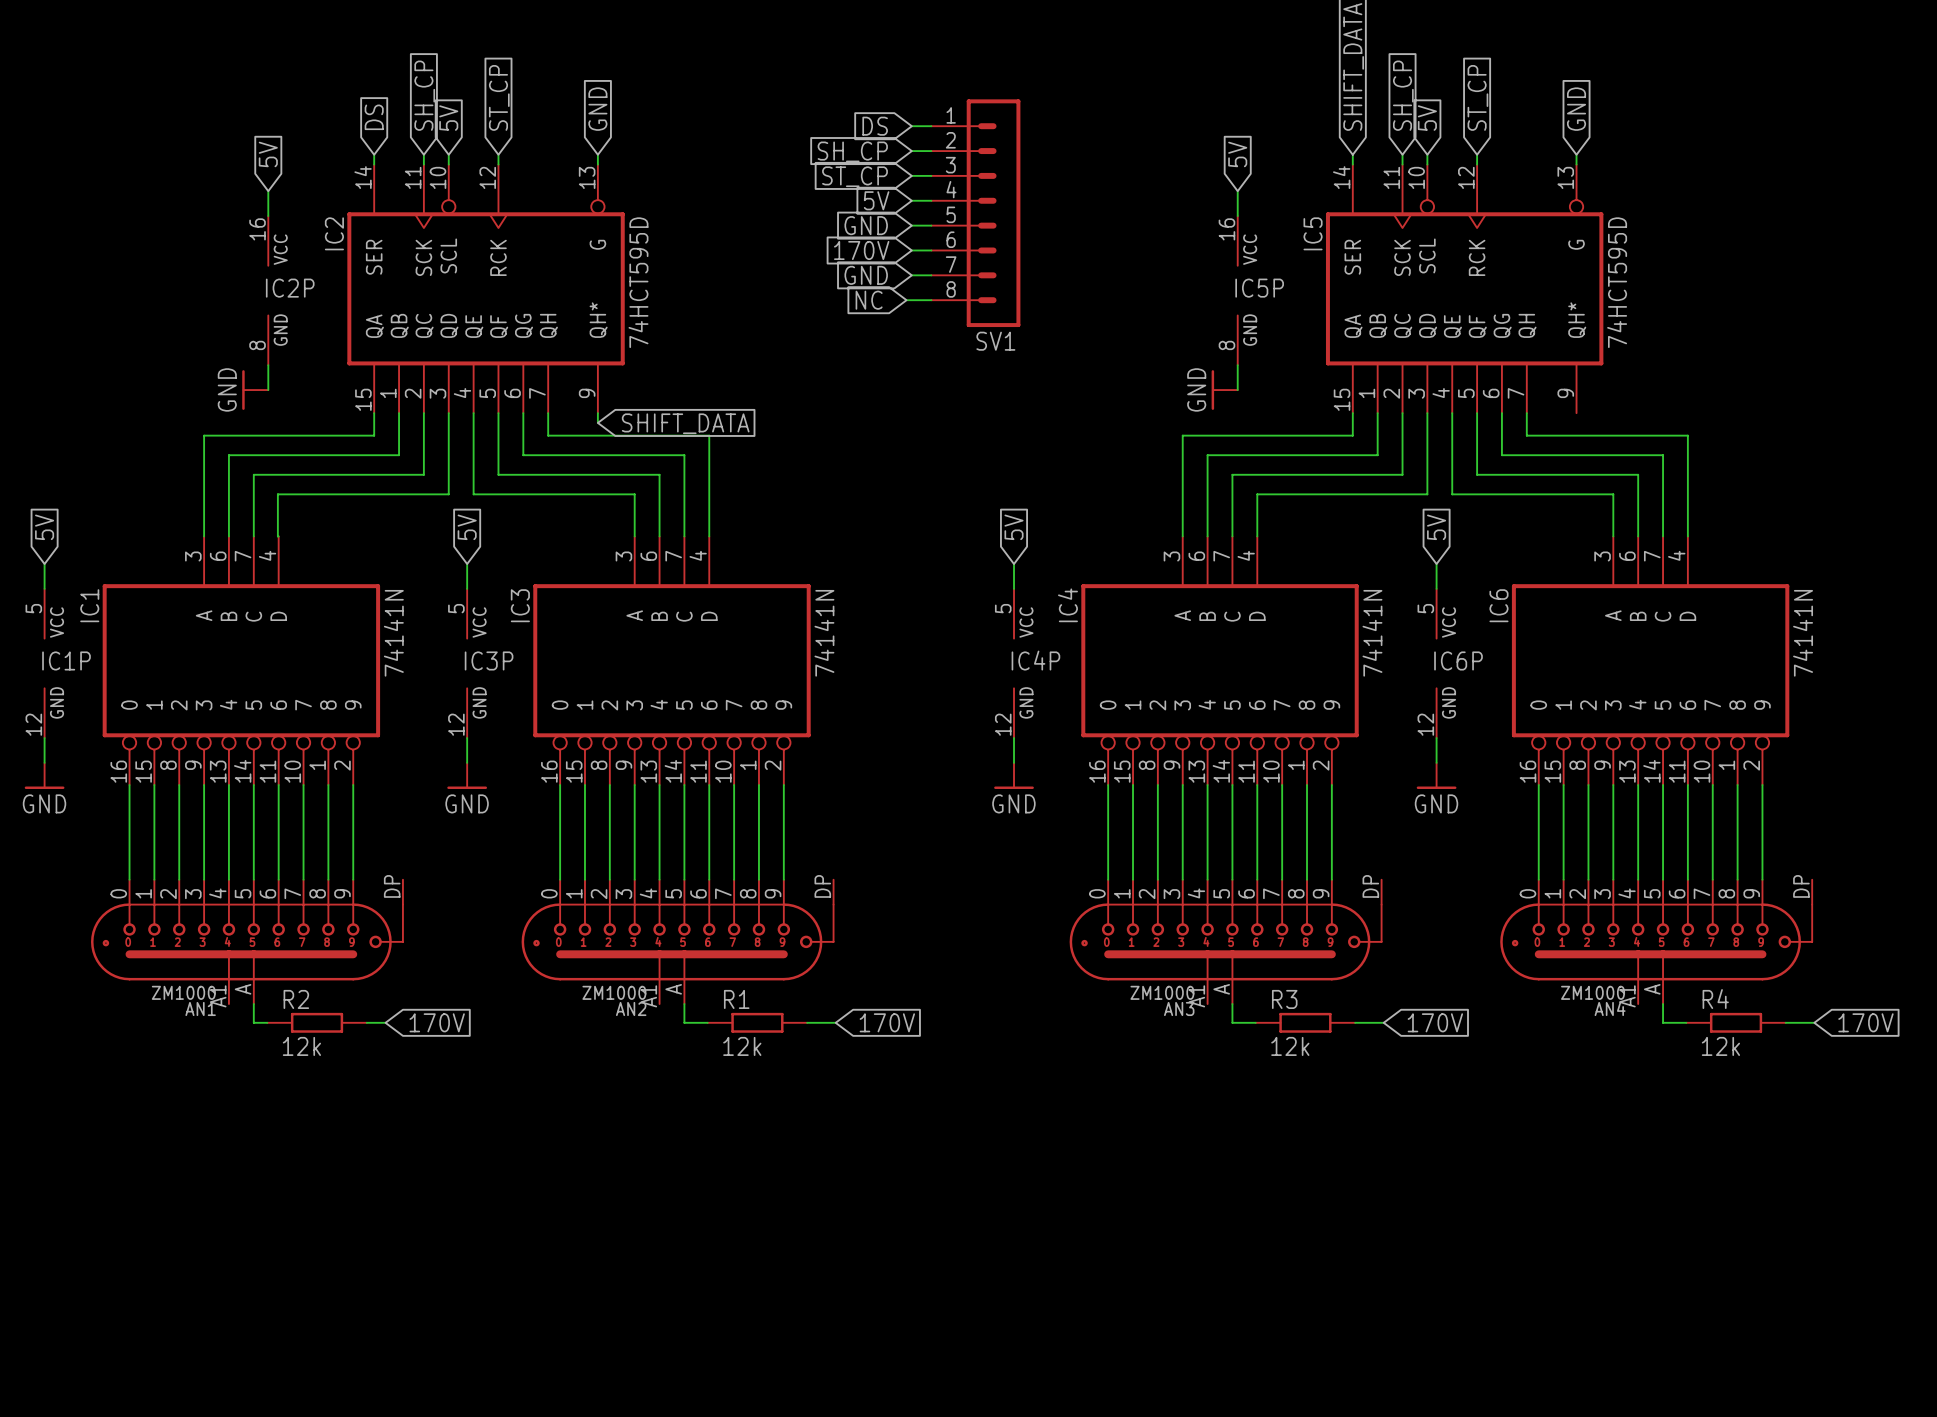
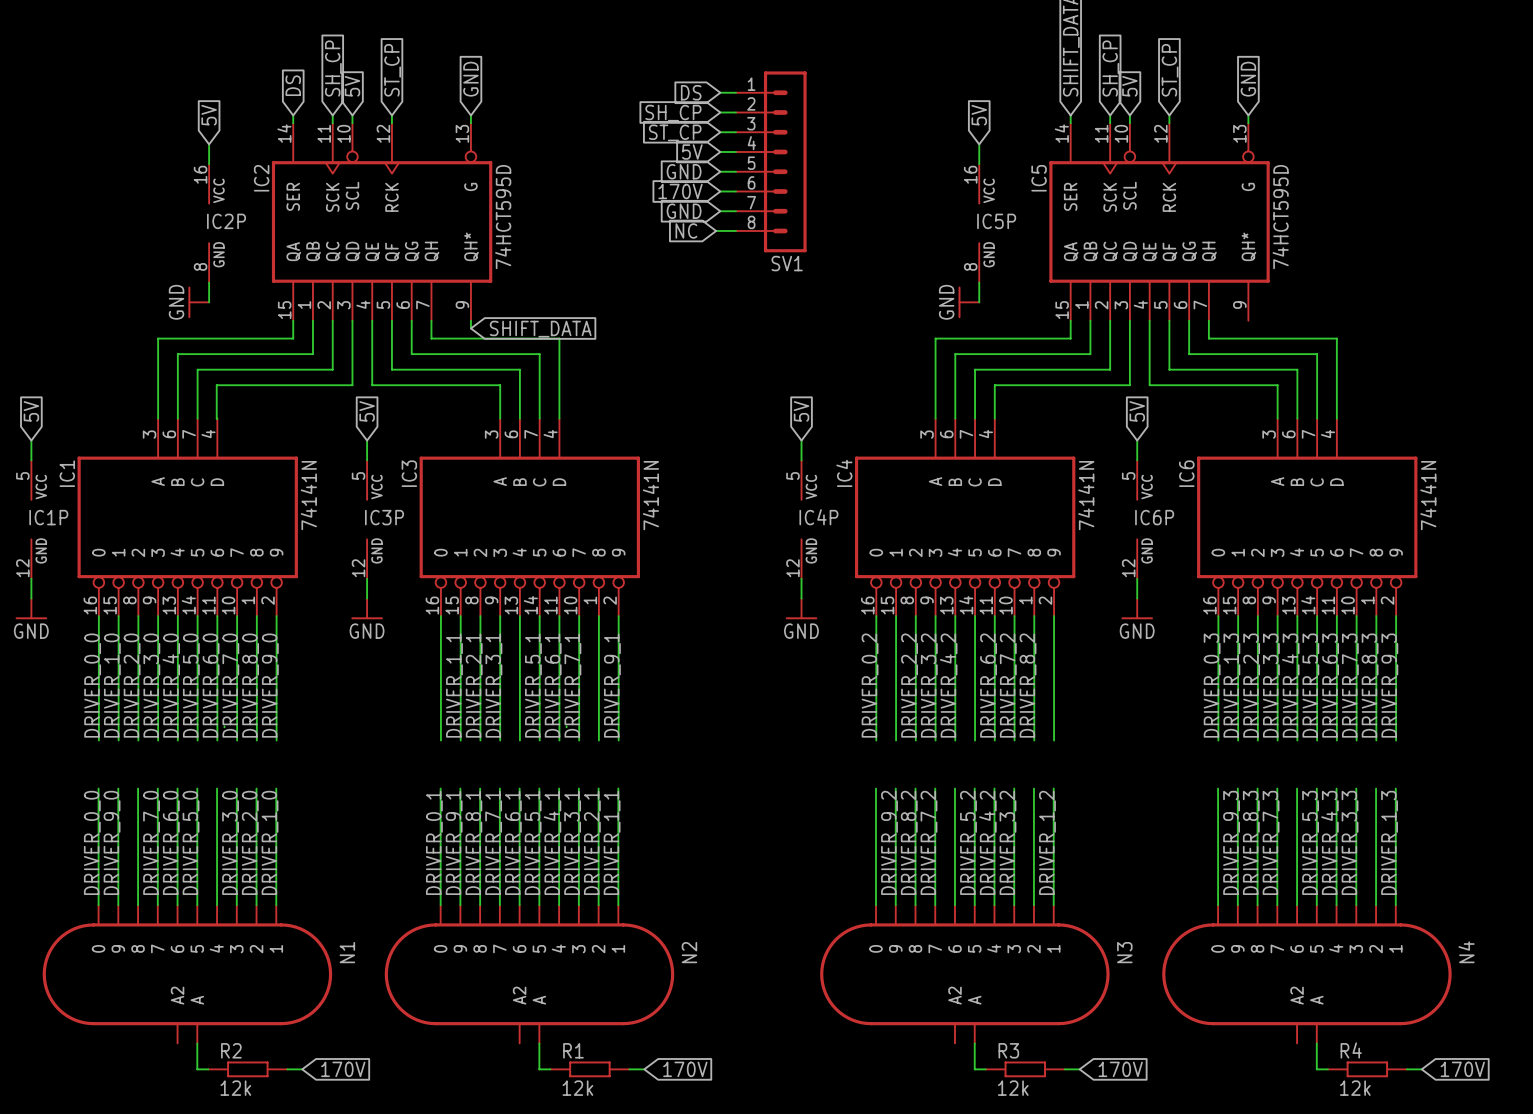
label: none -> DRIVER_0_0 (92, 685)
label: none -> DRIVER_1_0 (112, 685)
label: none -> DRIVER_2_0 (132, 685)
label: none -> DRIVER_3_0 (151, 685)
label: none -> DRIVER_4_0 (171, 685)
label: none -> DRIVER_5_0 (191, 685)
label: none -> DRIVER_6_0 (211, 685)
label: none -> DRIVER_7_0 (230, 685)
label: none -> DRIVER_8_0 (250, 685)
label: none -> DRIVER_9_0 (270, 685)
label: none -> DRIVER_1_1 (454, 685)
label: none -> DRIVER_2_1 (474, 685)
label: none -> DRIVER_3_1 (493, 685)
label: none -> DRIVER_5_1 (533, 685)
label: none -> DRIVER_6_1 (553, 685)
label: none -> DRIVER_7_1 (572, 685)
label: none -> DRIVER_9_1 (612, 685)
label: none -> DRIVER_0_2 (870, 685)
label: none -> DRIVER_2_2 (909, 685)
label: none -> DRIVER_3_2 (929, 685)
label: none -> DRIVER_4_2 (948, 685)
label: none -> DRIVER_6_2 (988, 685)
label: none -> DRIVER_7_2 (1008, 685)
label: none -> DRIVER_8_2 (1028, 685)
label: none -> DRIVER_0_3 (1212, 685)
label: none -> DRIVER_1_3 (1231, 685)
label: none -> DRIVER_2_3 (1251, 685)
label: none -> DRIVER_3_3 (1271, 685)
label: none -> DRIVER_4_3 (1290, 685)
label: none -> DRIVER_5_3 (1310, 685)
label: none -> DRIVER_6_3 (1330, 685)
label: none -> DRIVER_7_3 (1350, 685)
label: none -> DRIVER_8_3 (1370, 685)
label: none -> DRIVER_9_3 (1389, 685)
wire: none -> (224, 726) (224, 727)
wire: none -> (566, 726) (566, 727)
AN1: ZM1000 (247, 941) -> none
AN2: ZM1000 (677, 941) -> none
AN3: ZM1000 (1225, 941) -> none
AN4: ZM1000 (1656, 941) -> none
wire: none -> (98, 788) (98, 905)
wire: none -> (118, 788) (118, 905)
wire: none -> (138, 788) (138, 905)
wire: none -> (157, 788) (157, 905)
wire: none -> (177, 788) (177, 905)
wire: none -> (197, 788) (197, 905)
wire: none -> (217, 788) (217, 905)
wire: none -> (236, 788) (236, 905)
wire: none -> (256, 788) (256, 905)
wire: none -> (276, 788) (276, 905)
wire: none -> (440, 788) (440, 905)
wire: none -> (460, 788) (460, 905)
wire: none -> (480, 788) (480, 905)
wire: none -> (499, 788) (499, 905)
wire: none -> (519, 788) (519, 905)
wire: none -> (539, 788) (539, 905)
wire: none -> (559, 788) (559, 905)
wire: none -> (578, 788) (578, 905)
wire: none -> (598, 788) (598, 905)
wire: none -> (618, 788) (618, 905)
wire: none -> (876, 788) (876, 905)
wire: none -> (895, 788) (895, 905)
wire: none -> (915, 788) (915, 905)
wire: none -> (935, 788) (935, 905)
wire: none -> (954, 788) (954, 905)
wire: none -> (974, 788) (974, 905)
wire: none -> (994, 788) (994, 905)
wire: none -> (1014, 788) (1014, 905)
wire: none -> (1033, 788) (1033, 905)
wire: none -> (1053, 788) (1053, 905)
wire: none -> (1218, 788) (1218, 905)
wire: none -> (1237, 788) (1237, 905)
wire: none -> (1257, 788) (1257, 905)
wire: none -> (1277, 788) (1277, 905)
wire: none -> (1297, 788) (1297, 905)
wire: none -> (1316, 788) (1316, 905)
wire: none -> (1336, 788) (1336, 905)
wire: none -> (1356, 788) (1356, 905)
wire: none -> (1376, 788) (1376, 905)
wire: none -> (1395, 788) (1395, 905)
wire: (253, 1004) (253, 1022) (267, 1022) -> none
wire: (684, 1004) (684, 1022) (707, 1022) -> none
wire: (1232, 1004) (1232, 1022) (1255, 1022) -> none
wire: (1663, 1004) (1663, 1022) (1686, 1022) -> none
R2 position: (317, 1022) -> (247, 1069)
wire: (366, 1022) (385, 1022) -> none
global label: 170V (437, 1022) -> none
R1 position: (757, 1022) -> (589, 1069)
wire: (807, 1022) (835, 1022) -> none
global label: 170V (887, 1022) -> none
R3 position: (1305, 1022) -> (1025, 1069)
wire: (1355, 1022) (1383, 1022) -> none
global label: 170V (1435, 1022) -> none
R4 position: (1736, 1022) -> (1367, 1069)
wire: (1785, 1022) (1814, 1022) -> none
global label: 170V (1865, 1022) -> none
label: none -> DRIVER_0_0 (92, 842)
label: none -> DRIVER_9_0 (112, 842)
label: none -> DRIVER_7_0 (151, 842)
label: none -> DRIVER_6_0 (171, 842)
label: none -> DRIVER_5_0 (191, 842)
label: none -> DRIVER_3_0 (230, 842)
label: none -> DRIVER_2_0 (250, 842)
label: none -> DRIVER_1_0 (270, 842)
label: none -> DRIVER_0_1 (434, 842)
label: none -> DRIVER_9_1 (454, 842)
label: none -> DRIVER_8_1 (473, 842)
label: none -> DRIVER_7_1 (493, 842)
label: none -> DRIVER_6_1 (513, 842)
label: none -> DRIVER_5_1 (533, 842)
label: none -> DRIVER_4_1 (552, 842)
label: none -> DRIVER_3_1 (572, 842)
label: none -> DRIVER_2_1 (592, 842)
label: none -> DRIVER_1_1 (612, 842)
label: none -> DRIVER_9_2 (889, 842)
label: none -> DRIVER_8_2 (909, 842)
label: none -> DRIVER_7_2 (928, 842)
label: none -> DRIVER_5_2 (968, 842)
label: none -> DRIVER_4_2 (987, 842)
label: none -> DRIVER_3_2 (1007, 842)
label: none -> DRIVER_1_2 (1047, 842)
label: none -> DRIVER_9_3 (1231, 842)
label: none -> DRIVER_8_3 (1251, 842)
label: none -> DRIVER_7_3 (1271, 842)
label: none -> DRIVER_5_3 (1310, 842)
label: none -> DRIVER_4_3 (1329, 842)
label: none -> DRIVER_3_3 (1350, 842)
label: none -> DRIVER_1_3 (1389, 842)
N1: none -> (187, 974)
N2: none -> (529, 974)
N3: none -> (964, 974)
N4: none -> (1306, 974)
wire: none -> (197, 1043) (197, 1069) (208, 1069)
wire: none -> (539, 1043) (539, 1069) (550, 1069)
wire: none -> (974, 1043) (974, 1069) (985, 1069)
wire: none -> (1316, 1043) (1316, 1069) (1327, 1069)
wire: none -> (287, 1069) (302, 1069)
global label: none -> 170V (343, 1069)
wire: none -> (629, 1069) (644, 1069)
global label: none -> 170V (685, 1069)
wire: none -> (1064, 1069) (1079, 1069)
global label: none -> 170V (1120, 1069)
wire: none -> (1406, 1069) (1421, 1069)
global label: none -> 170V (1462, 1069)

